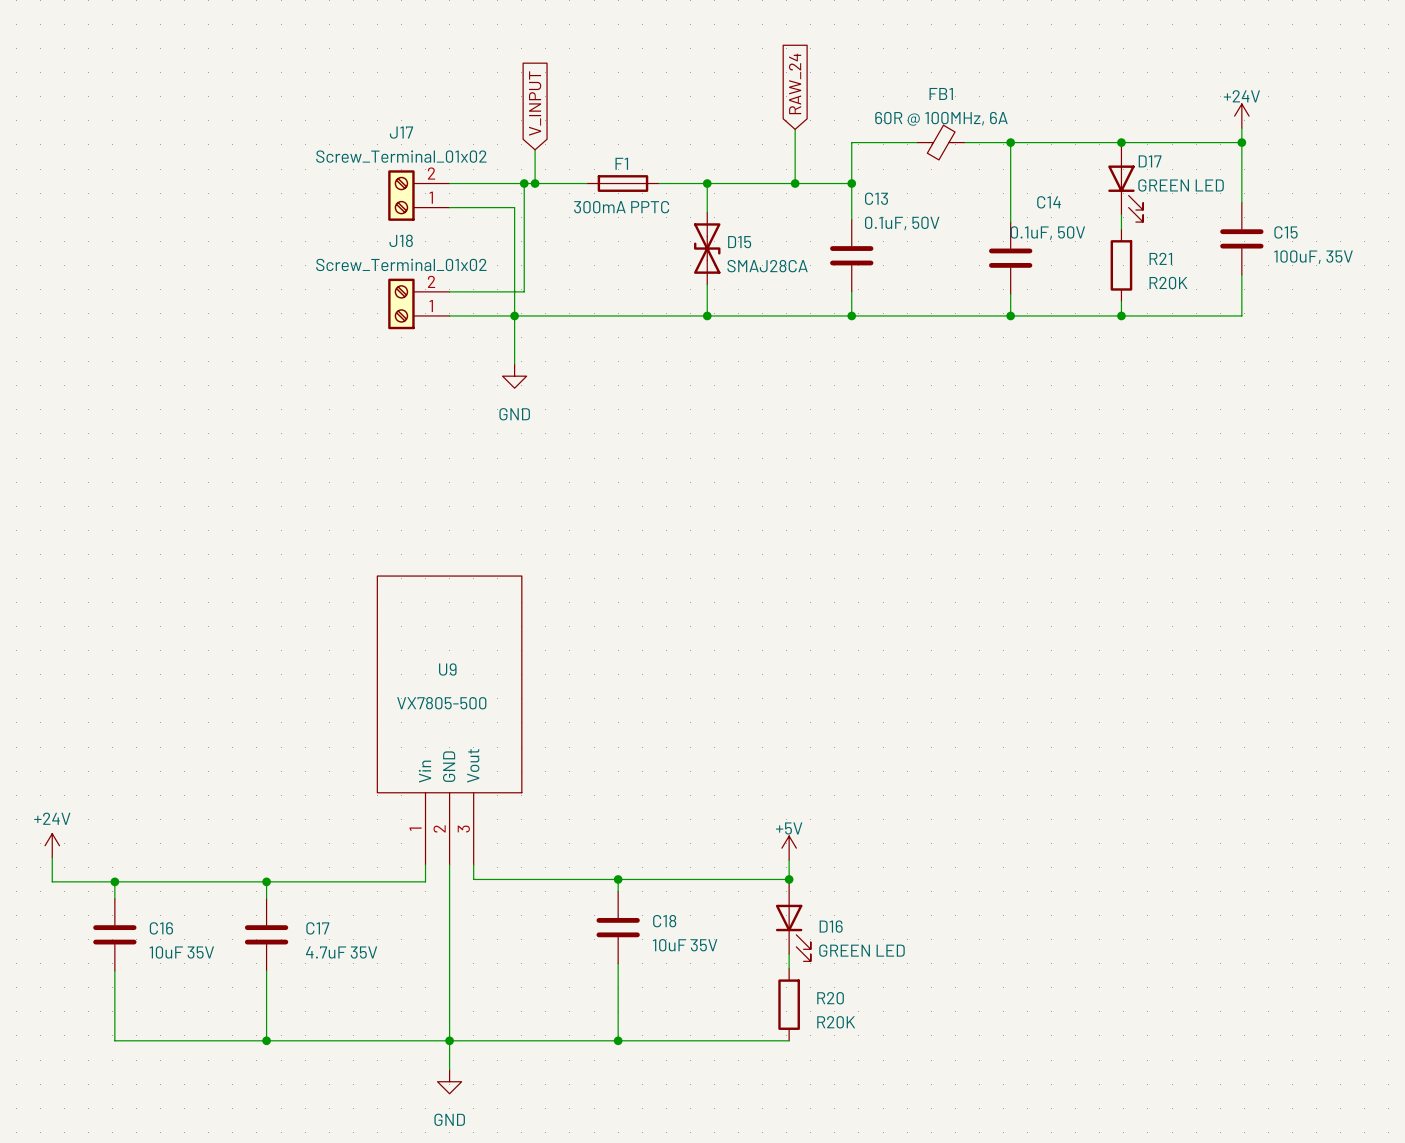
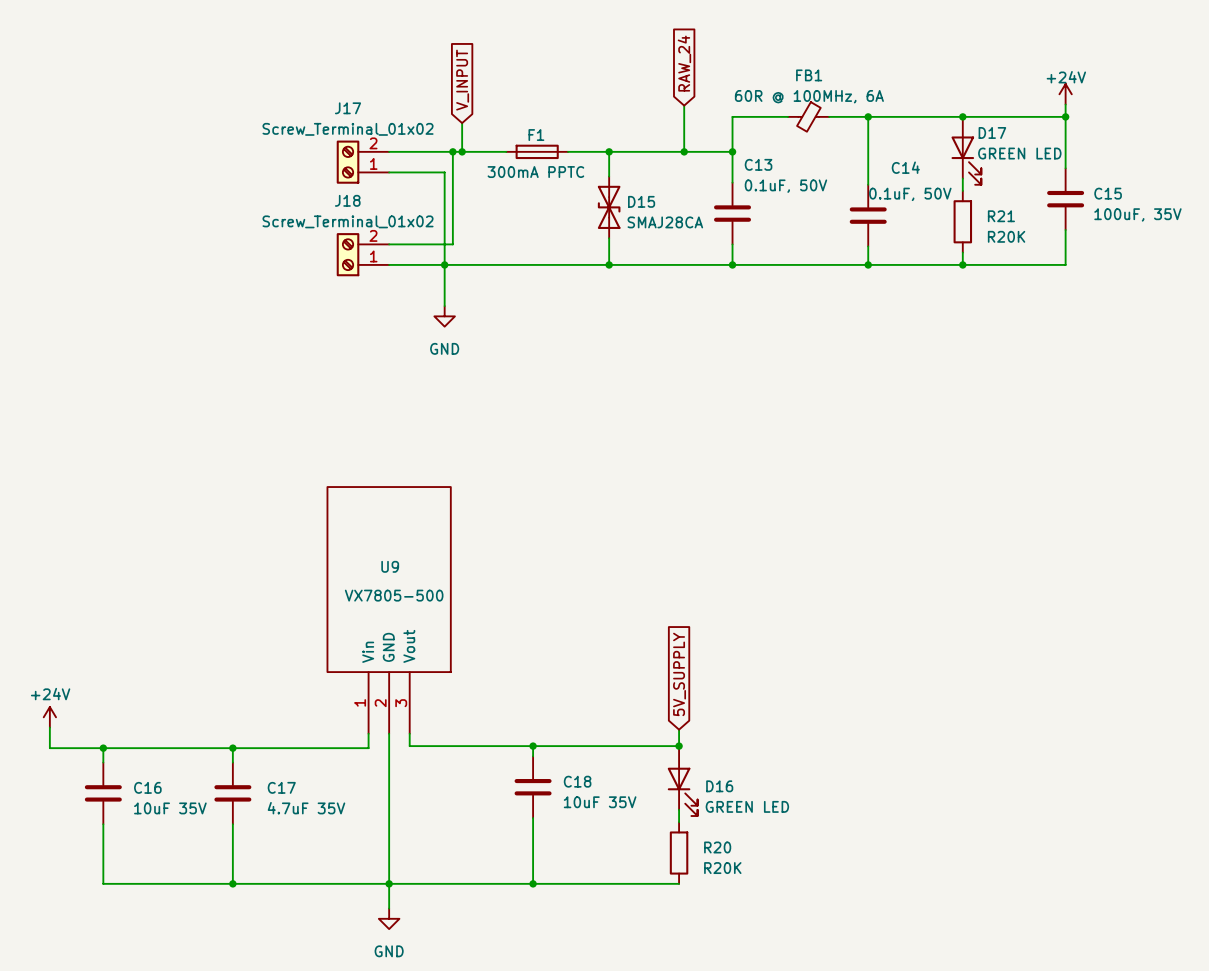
global label: none -> 5V_SUPPLY (679, 674)
power symbol: +5V (789, 848) -> none

